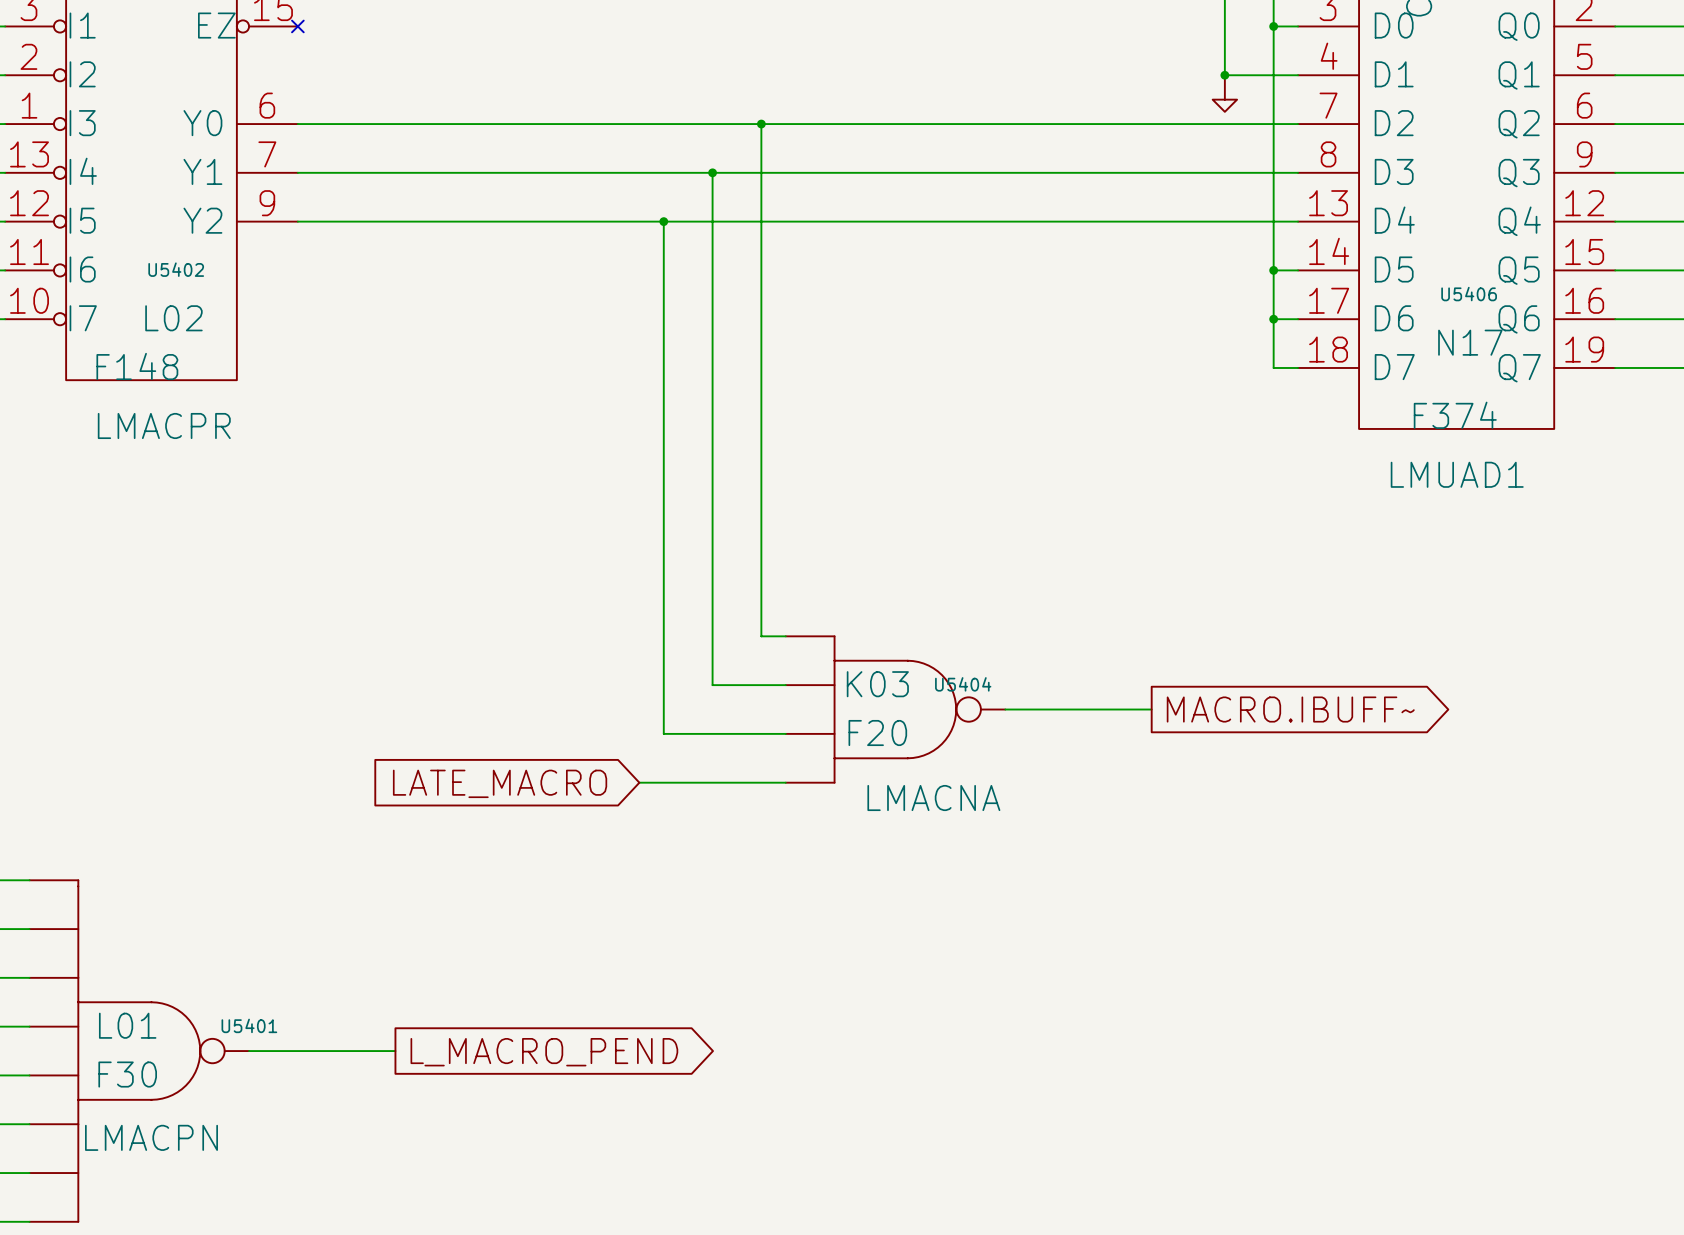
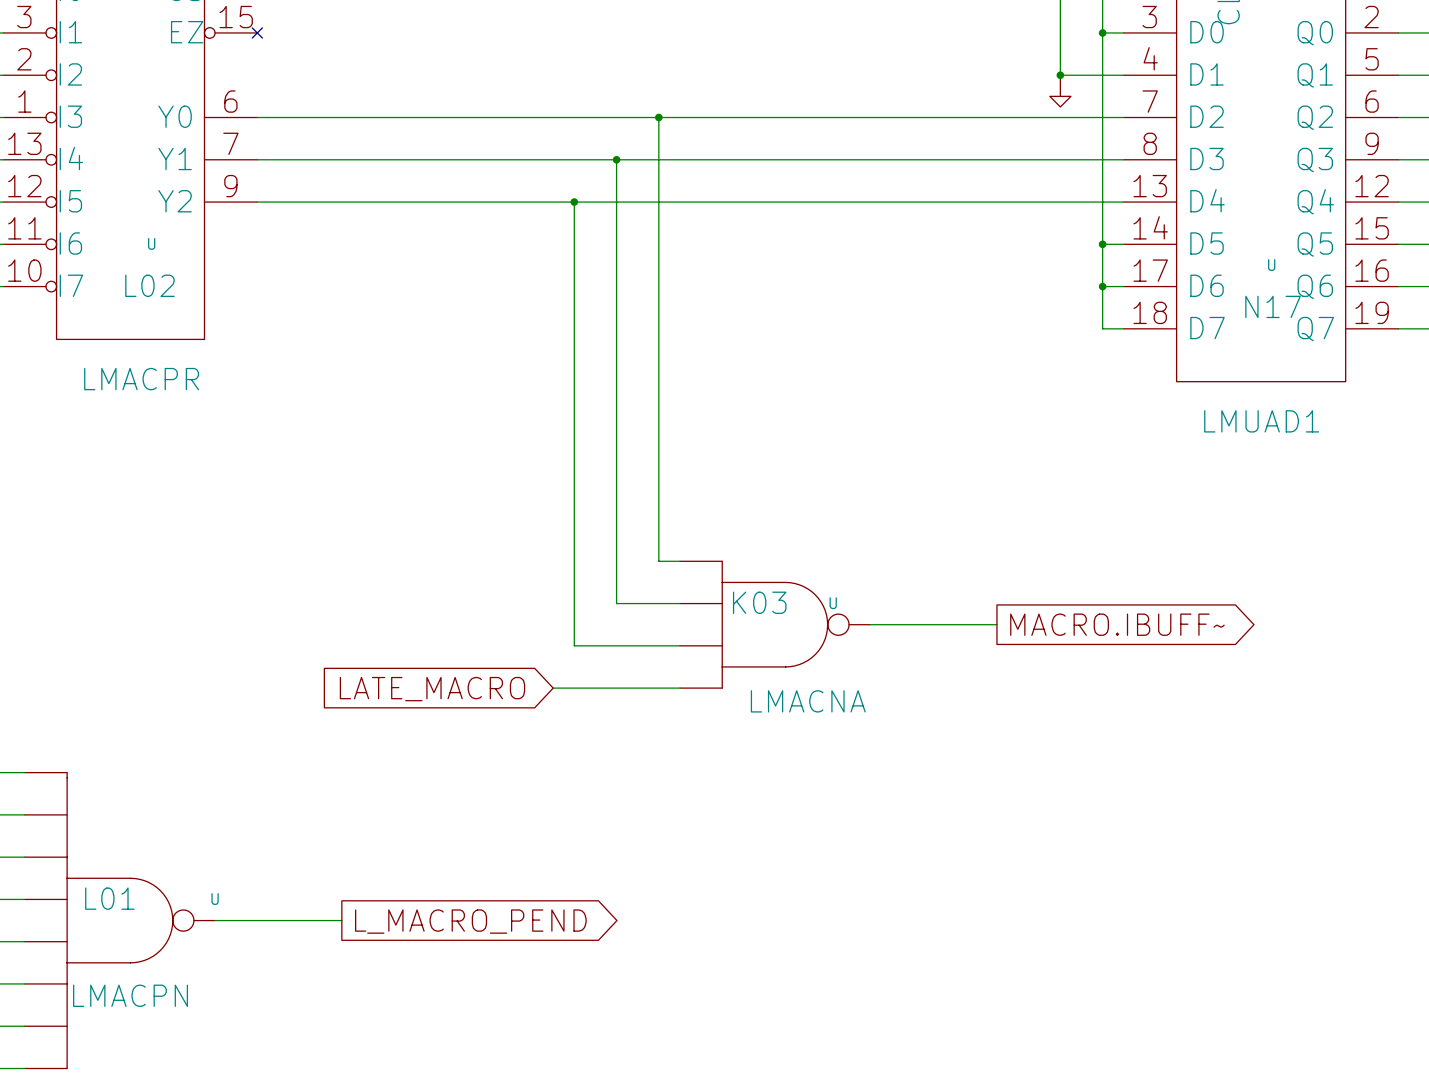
U5402 name: U5402 (176, 269) -> U (151, 243)
U5406 name: U5406 (1469, 294) -> U (1271, 265)
U5402 value: F148 (137, 366) -> none
U5406 value: F374 (1455, 415) -> none
U5404 name: U5404 (963, 684) -> U (833, 603)
U5404 value: F20 (877, 733) -> none
U5401 name: U5401 (249, 1025) -> U (215, 899)
U5401 value: F30 (127, 1074) -> none

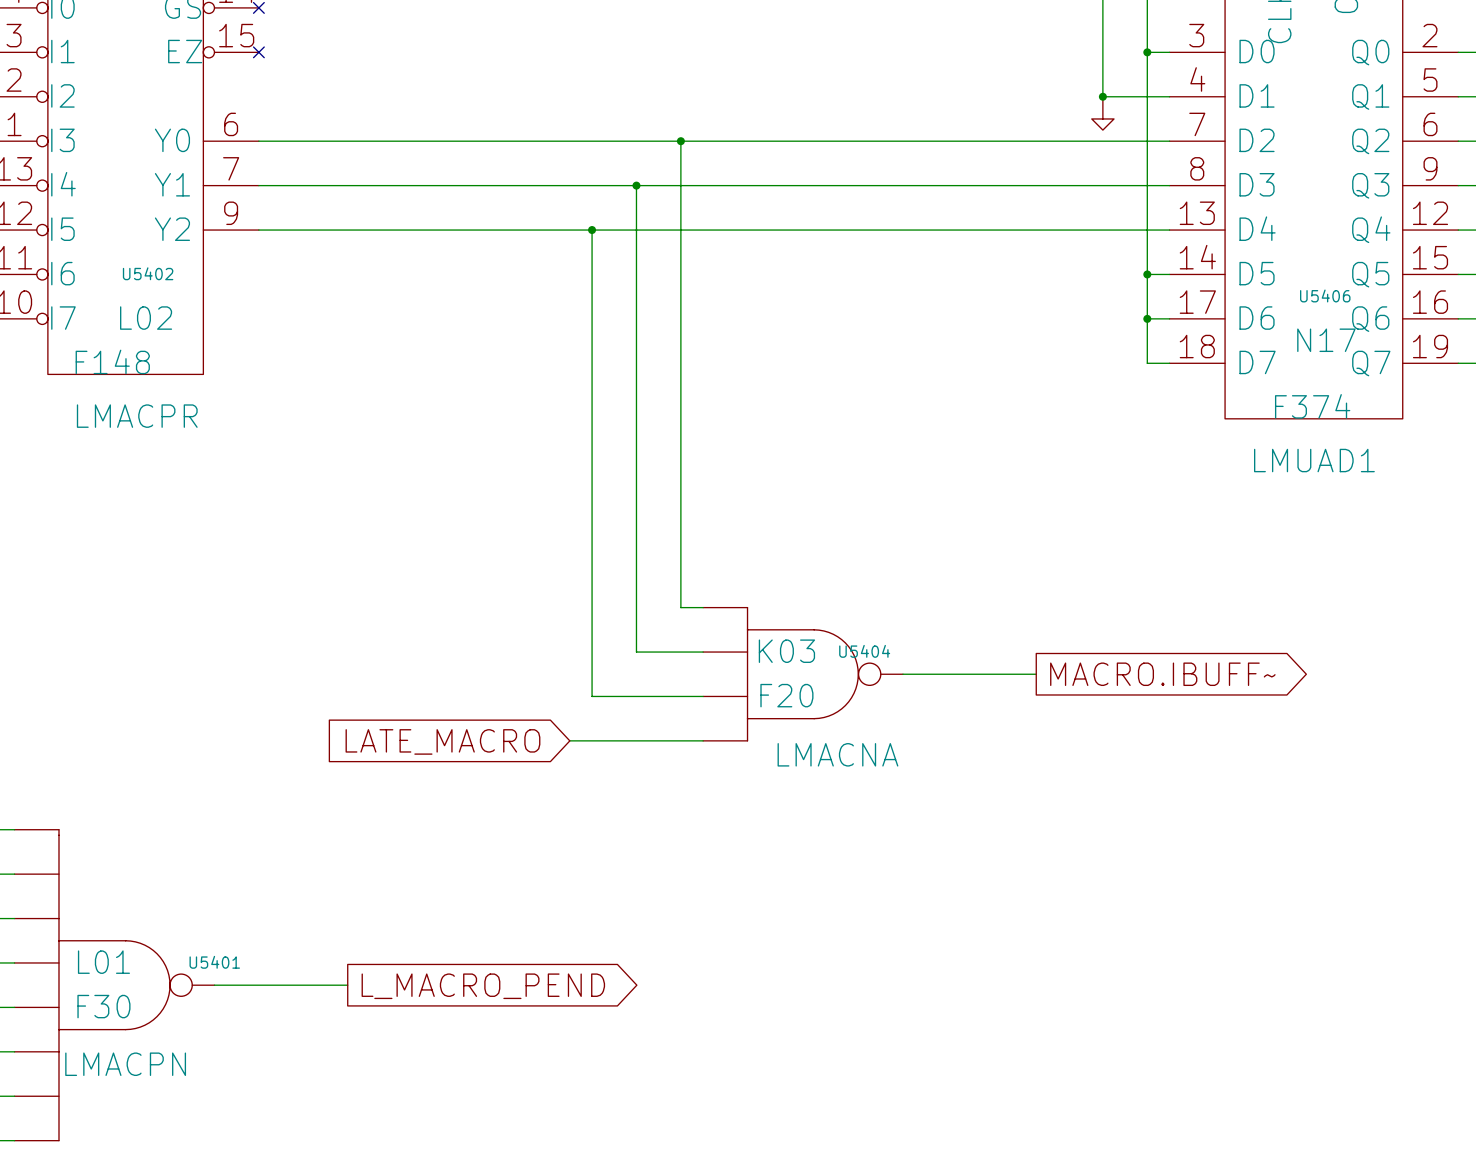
U name: U (151, 243) -> U5402 (148, 273)
U name: U (1271, 265) -> U5406 (1325, 295)
U value: none -> F148 (112, 361)
U value: none -> F374 (1312, 406)
U name: U (833, 603) -> U5404 (864, 651)
U value: none -> F20 (786, 695)
U name: U (215, 899) -> U5401 (214, 962)
U value: none -> F30 (103, 1006)

